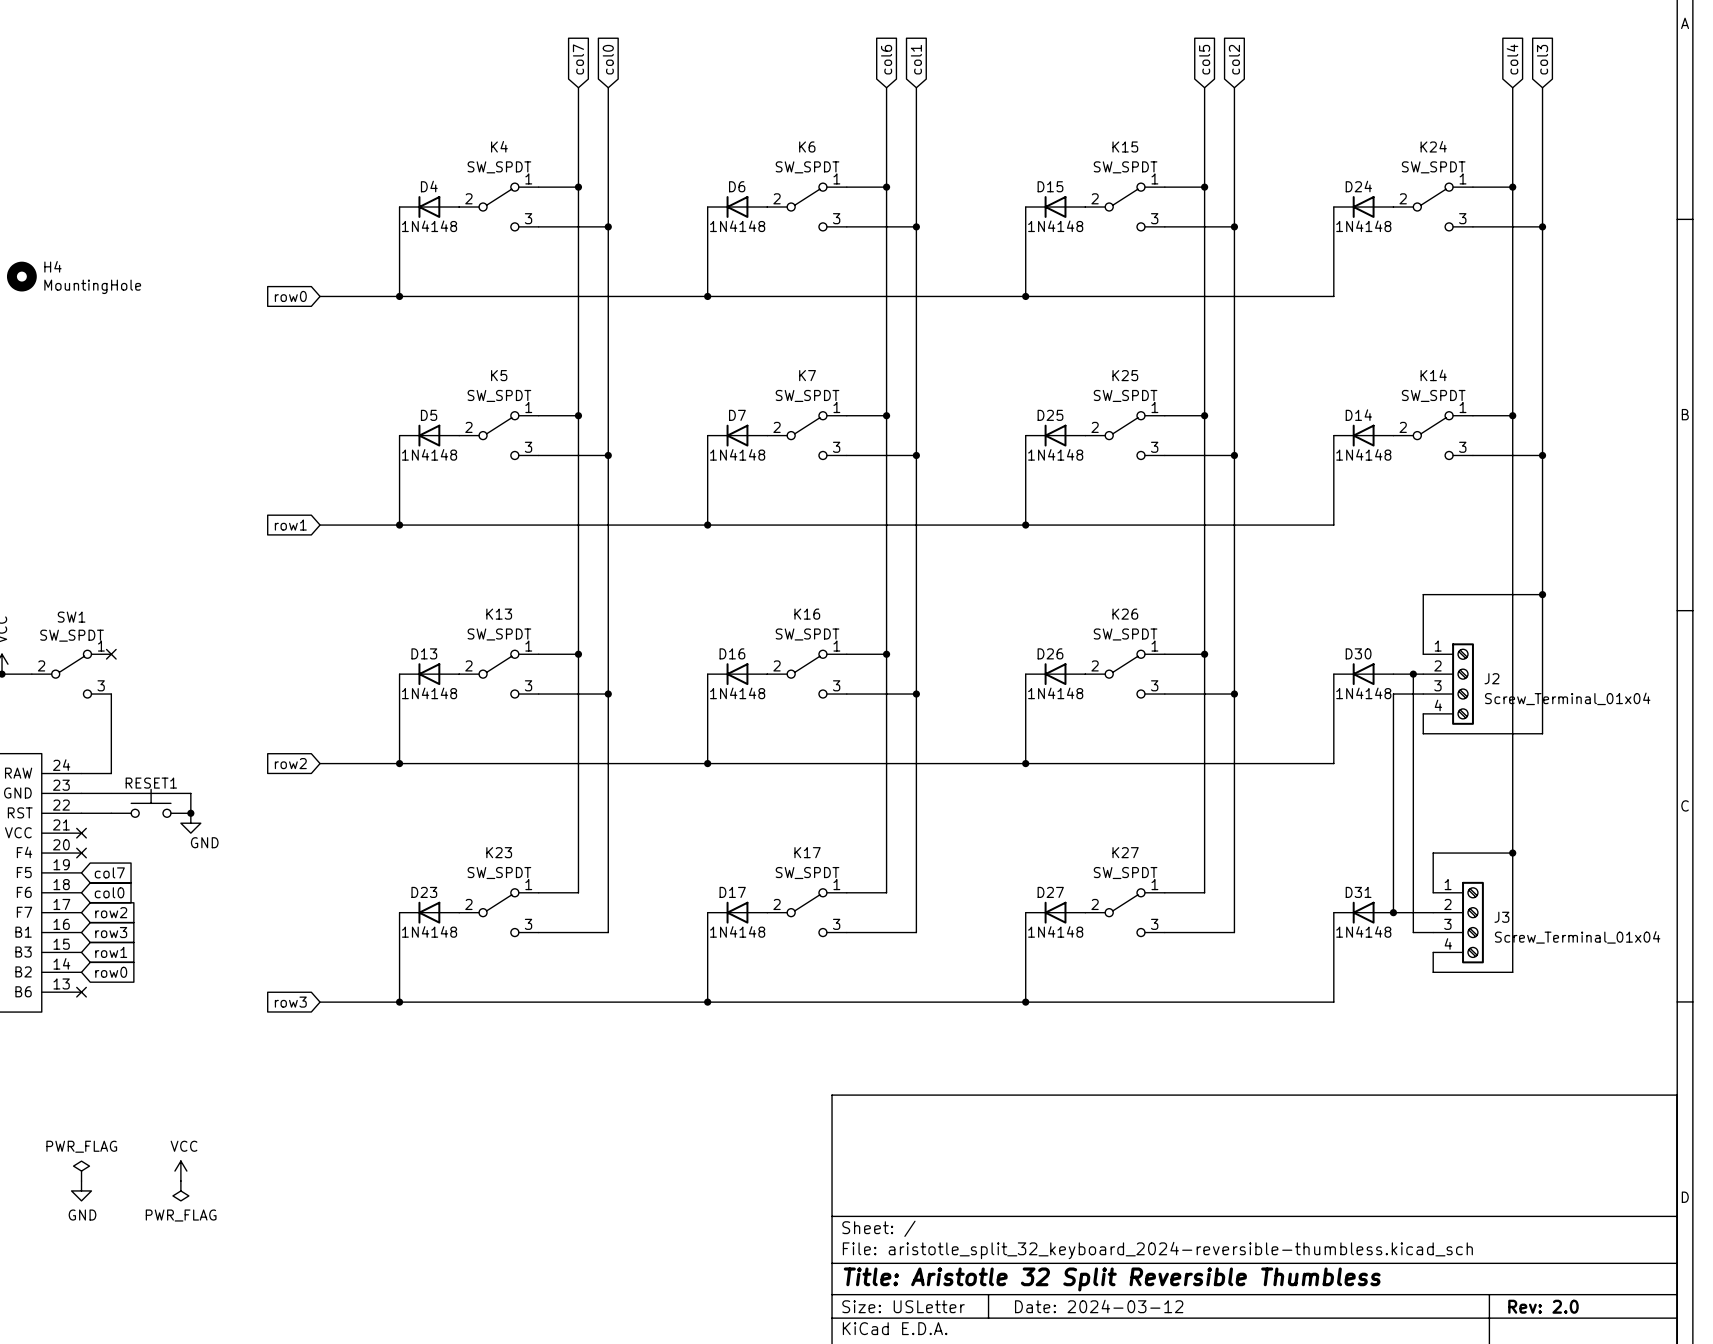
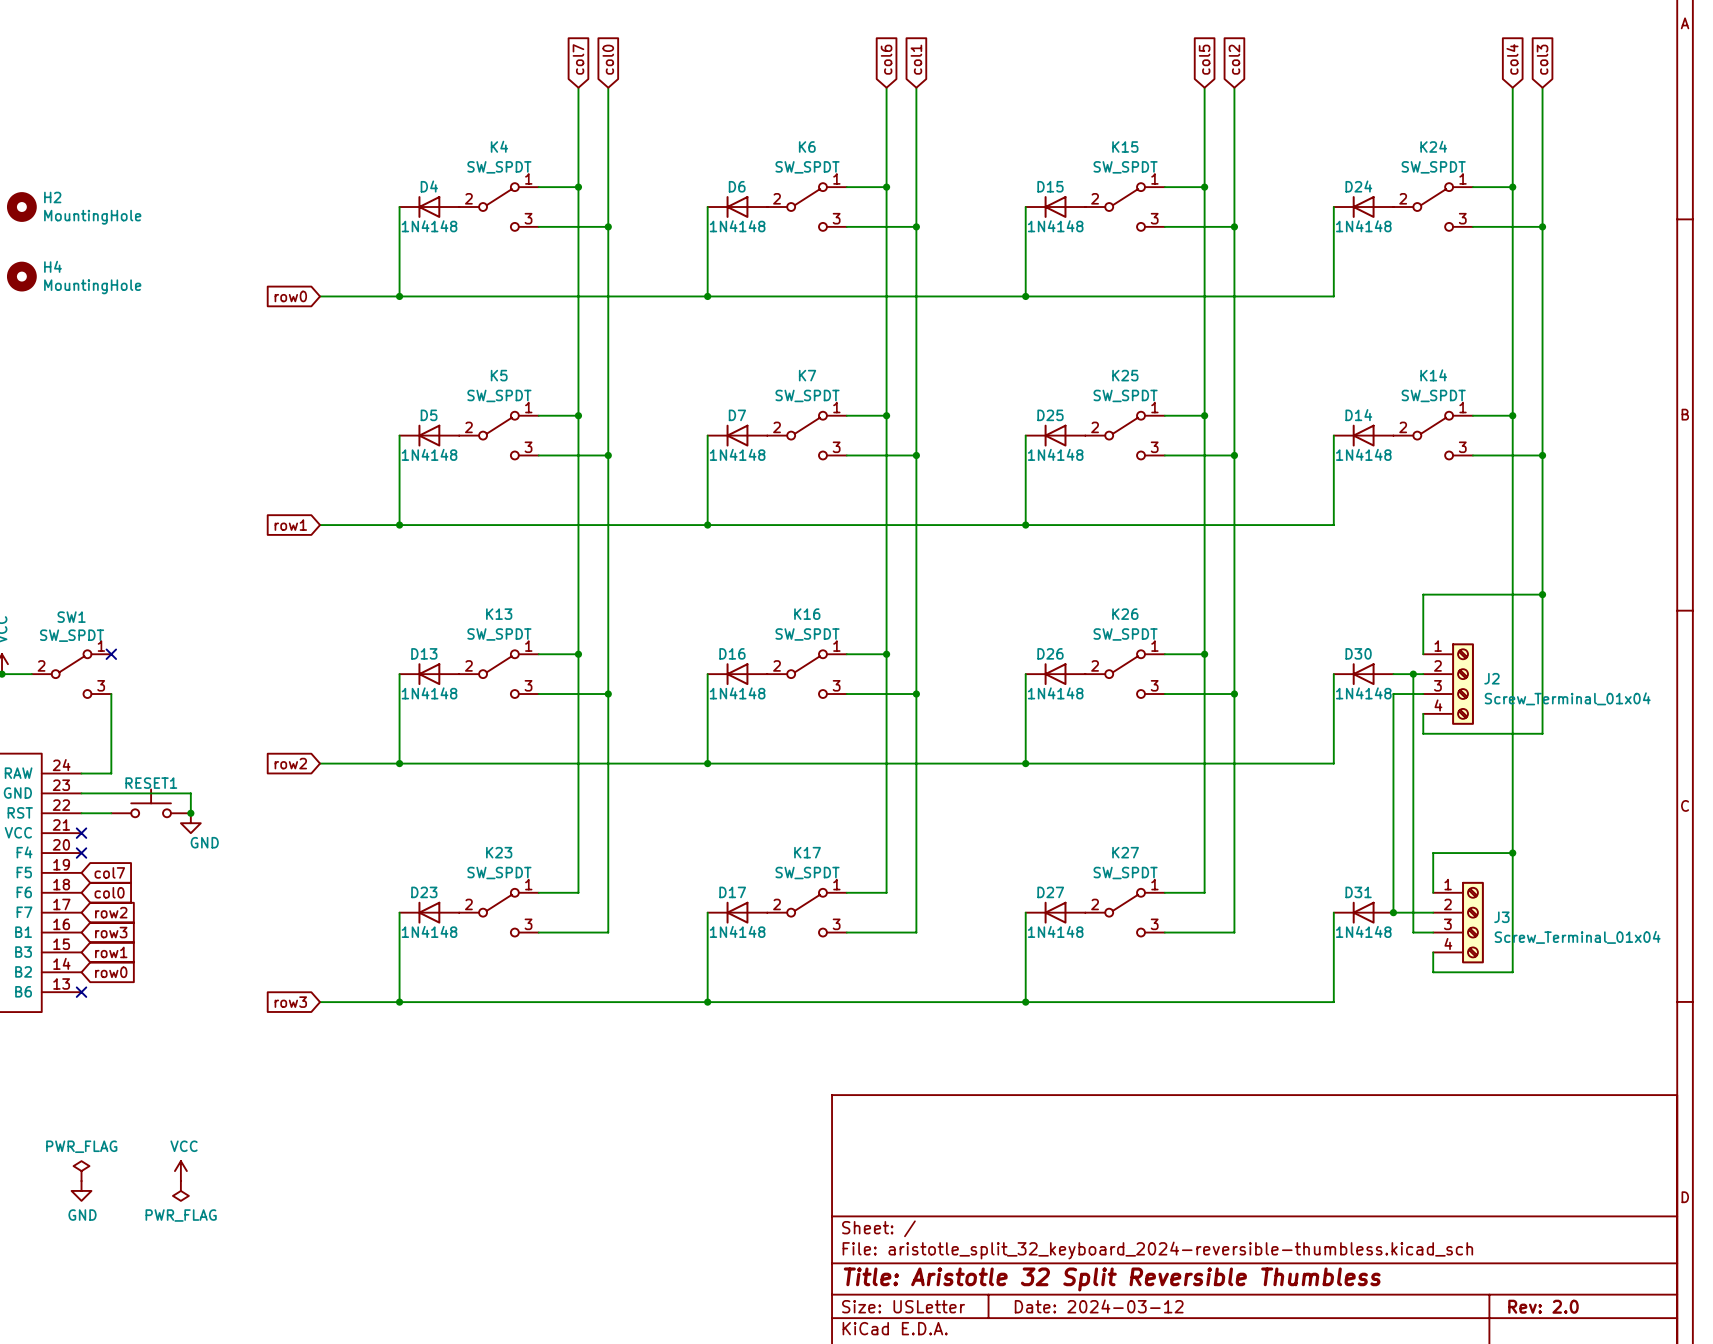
H2: none -> MountingHole (21, 207)

